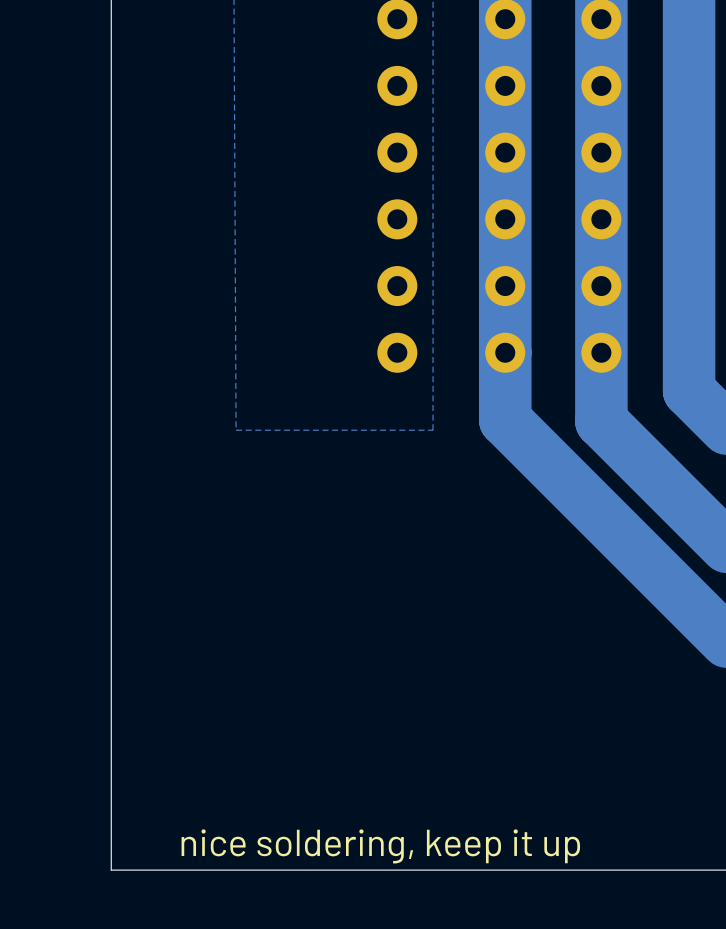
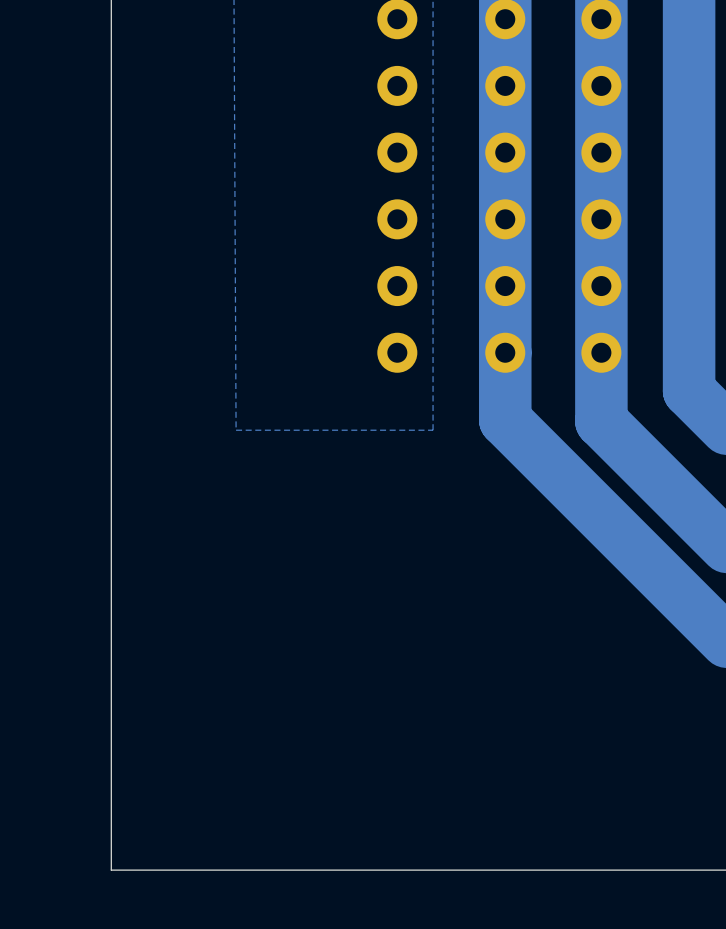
text: nice soldering, keep it up (380, 846) -> none

